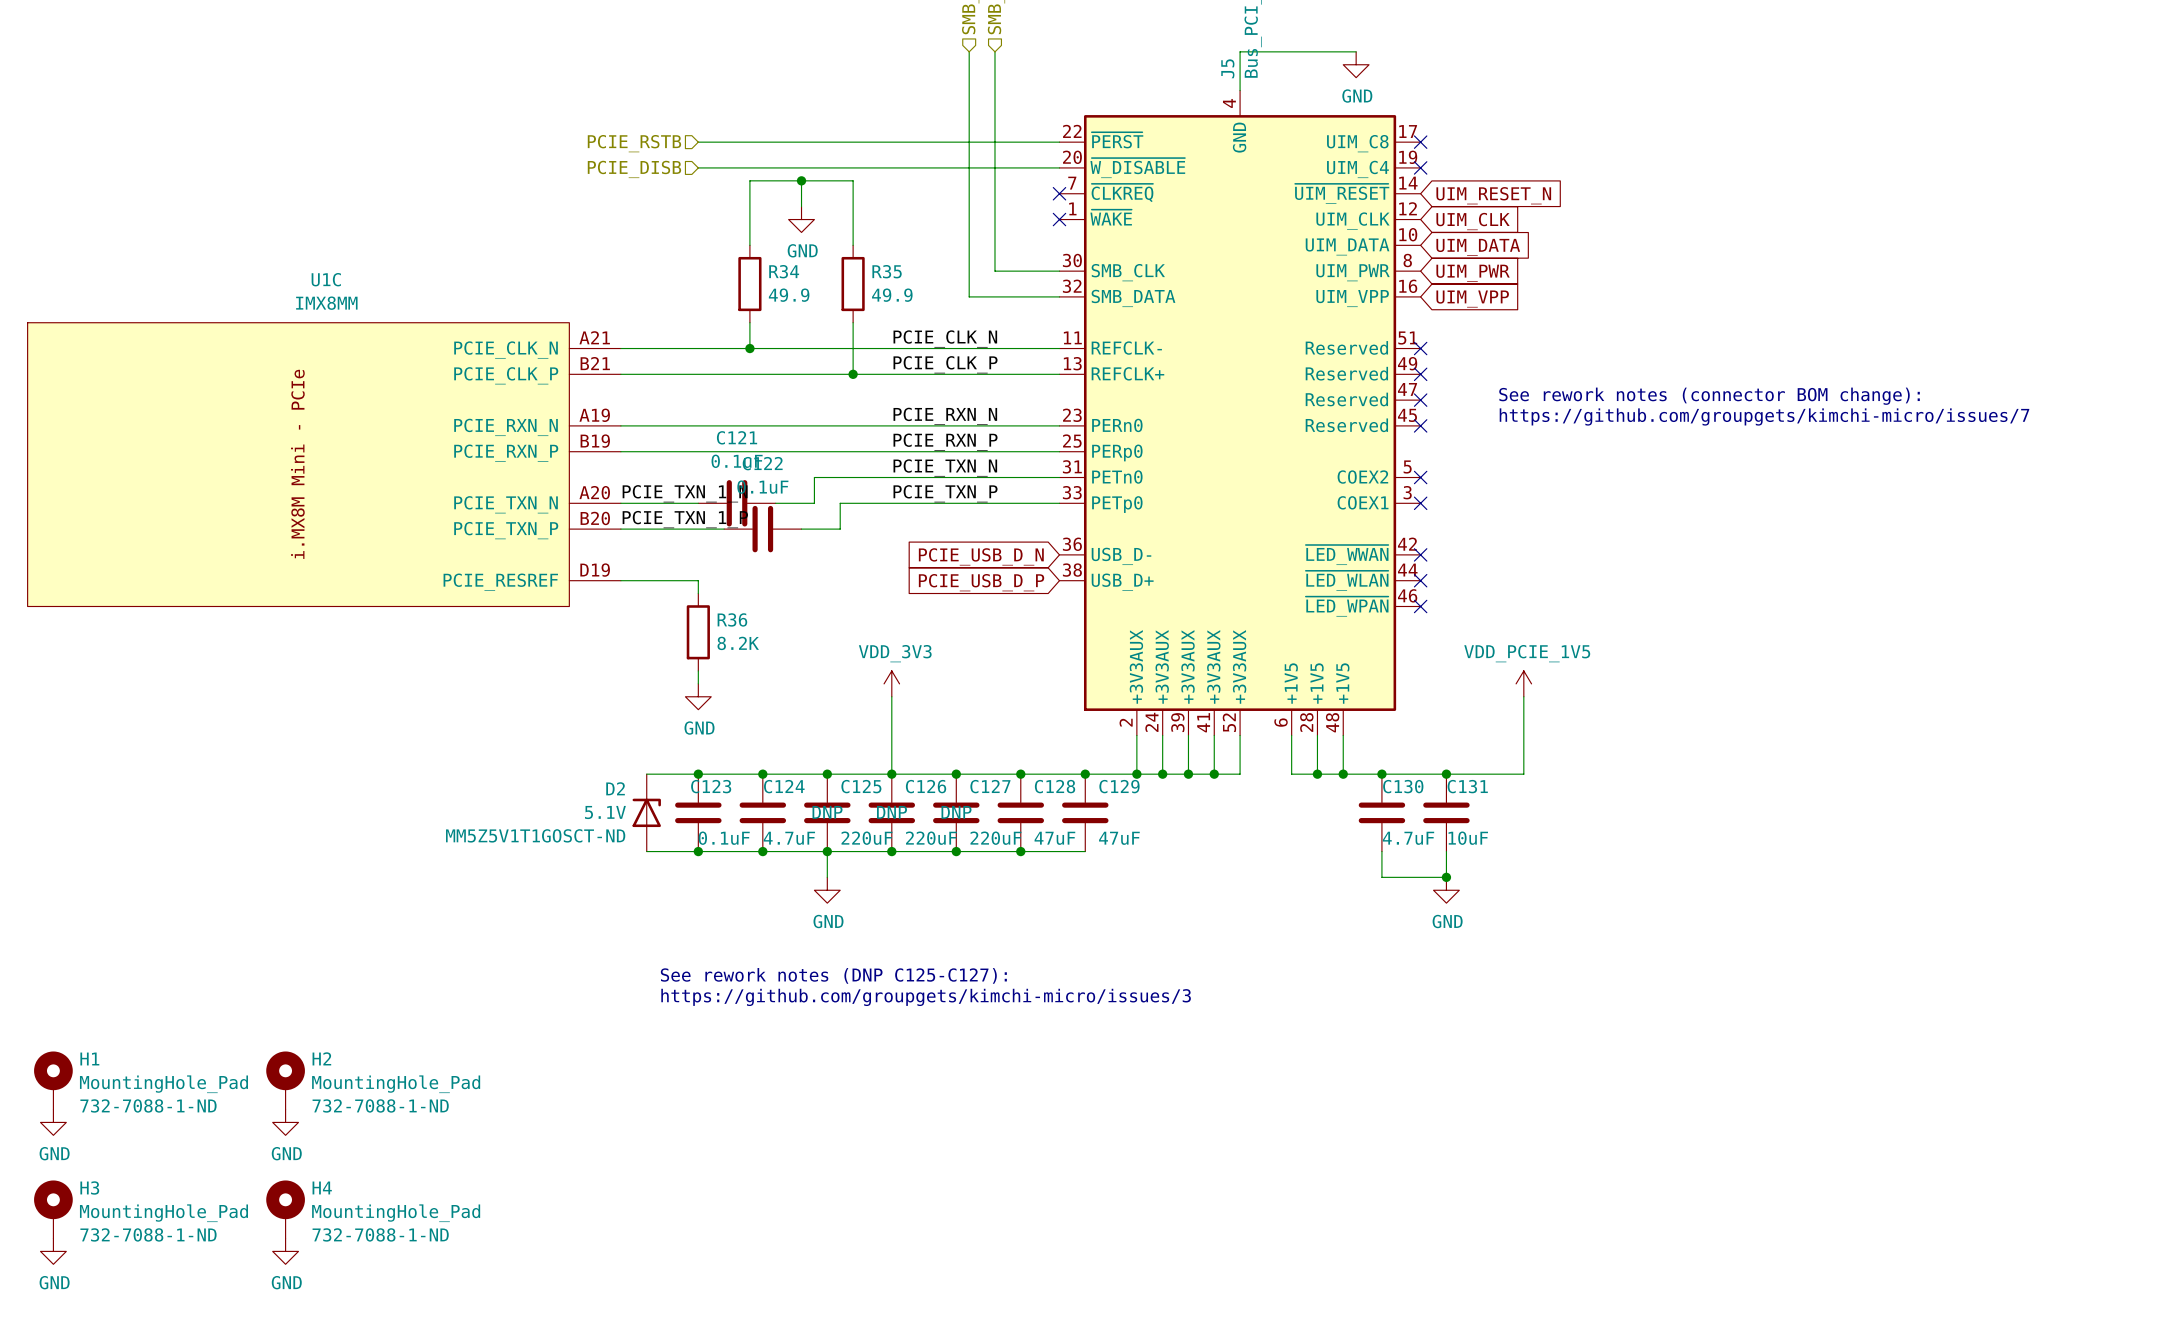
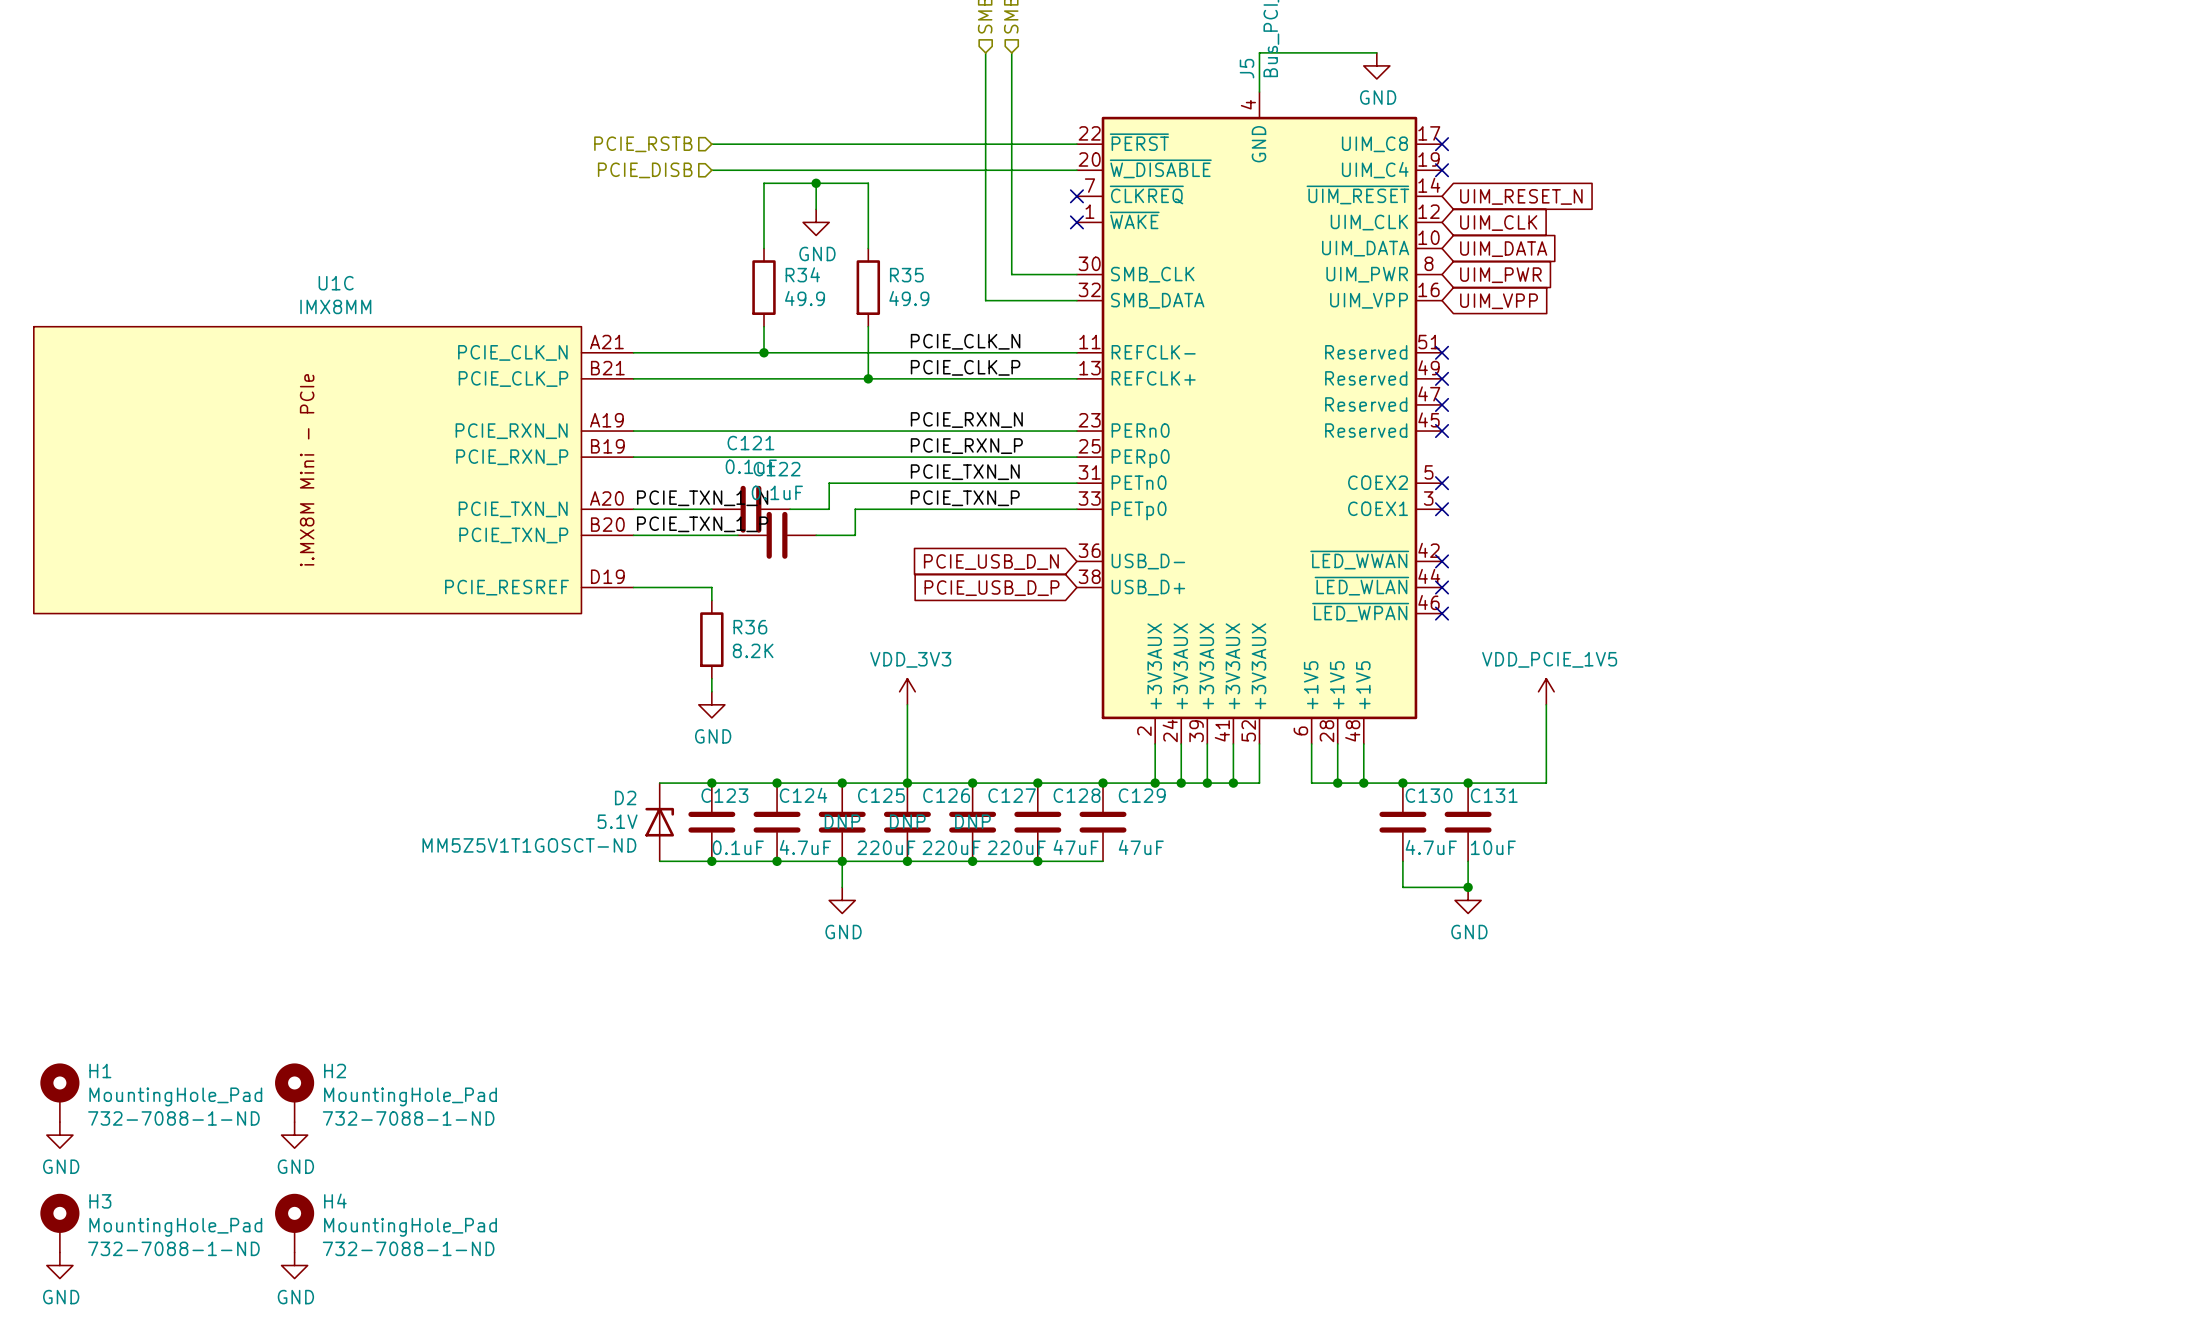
text: See rework notes (connector BOM change): (1709, 396) -> none
text: https://github.com/groupgets/kimchi-micro/issues/7 (1764, 416) -> none
text: See rework notes (DNP C125-C127): (833, 975) -> none
text: https://github.com/groupgets/kimchi-micro/issues/3 (926, 997) -> none

